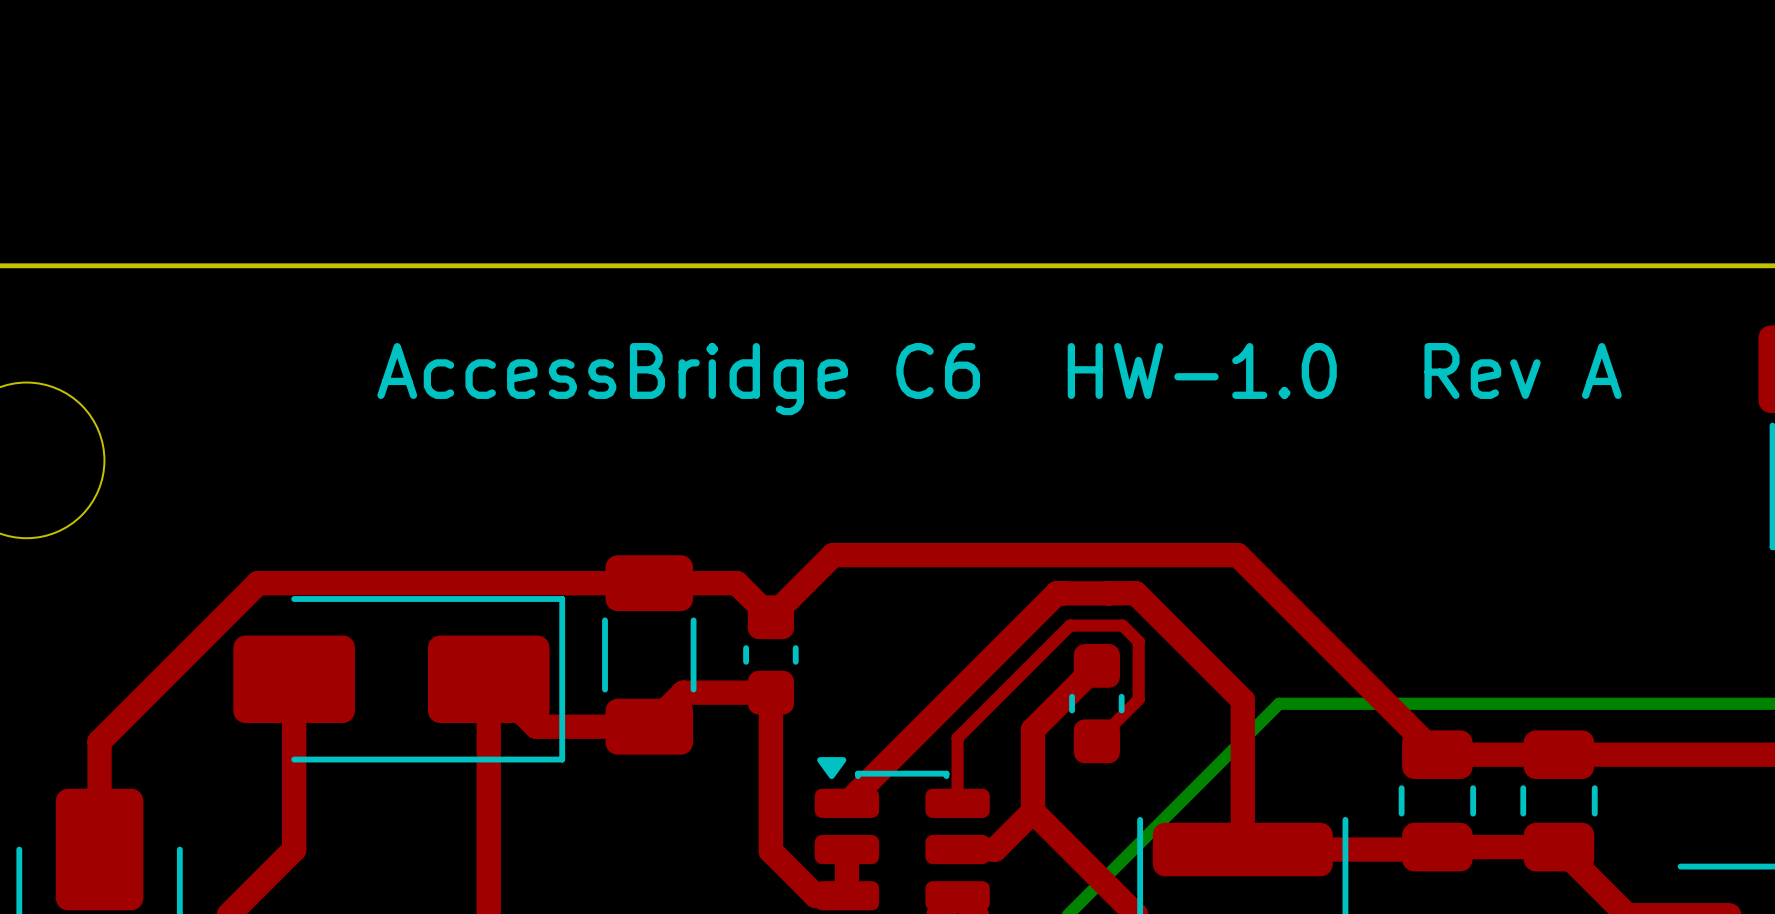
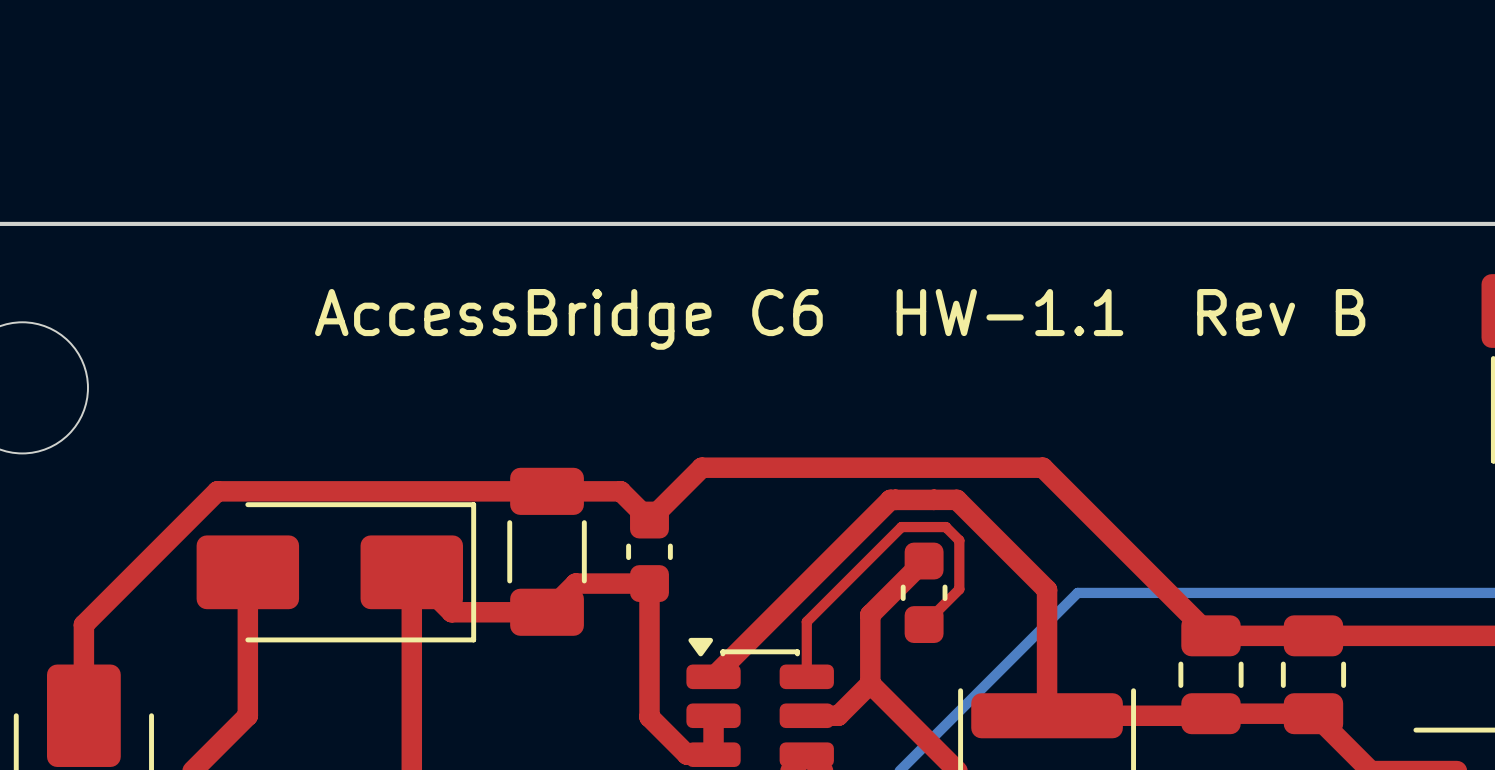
text: AccessBridge C6 HW-1.0 Rev A (999, 379) -> AccessBridge C6 HW-1.1 Rev B (840, 319)

